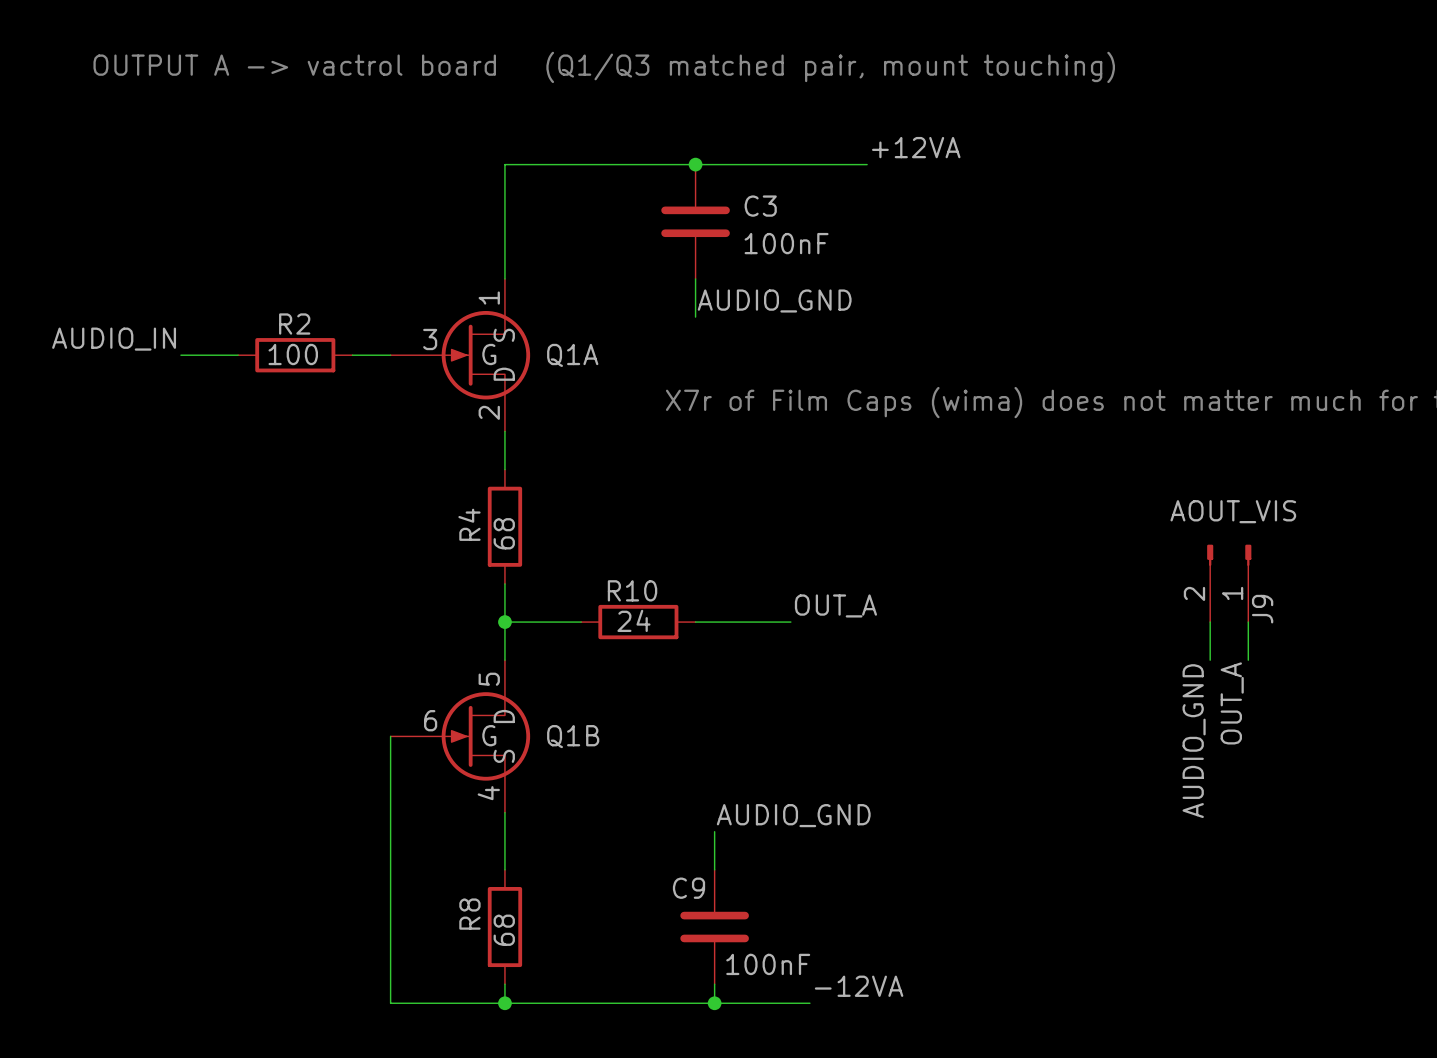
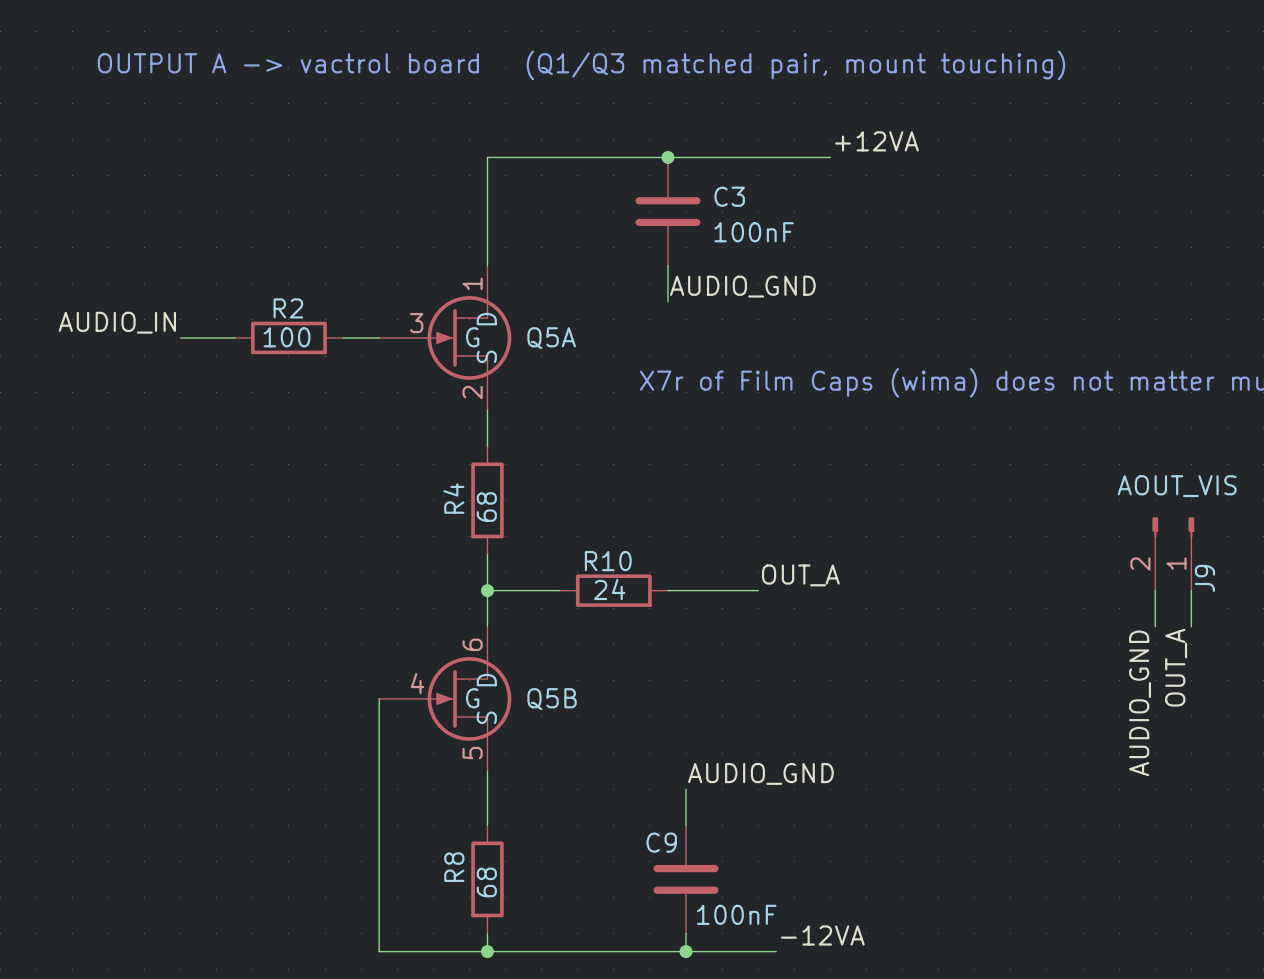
Q1A pin name: S (504, 335) -> D (486, 319)
Q1A name: Q1A (572, 355) -> Q5A (551, 338)
Q1A pin name: D (504, 374) -> S (486, 356)
Q1B pin number: 5 (489, 679) -> 6 (472, 644)
Q1B pin number: 6 (430, 720) -> 4 (417, 683)
Q1B name: Q1B (573, 736) -> Q5B (552, 699)
Q1B pin number: 4 (488, 793) -> 5 (472, 753)

